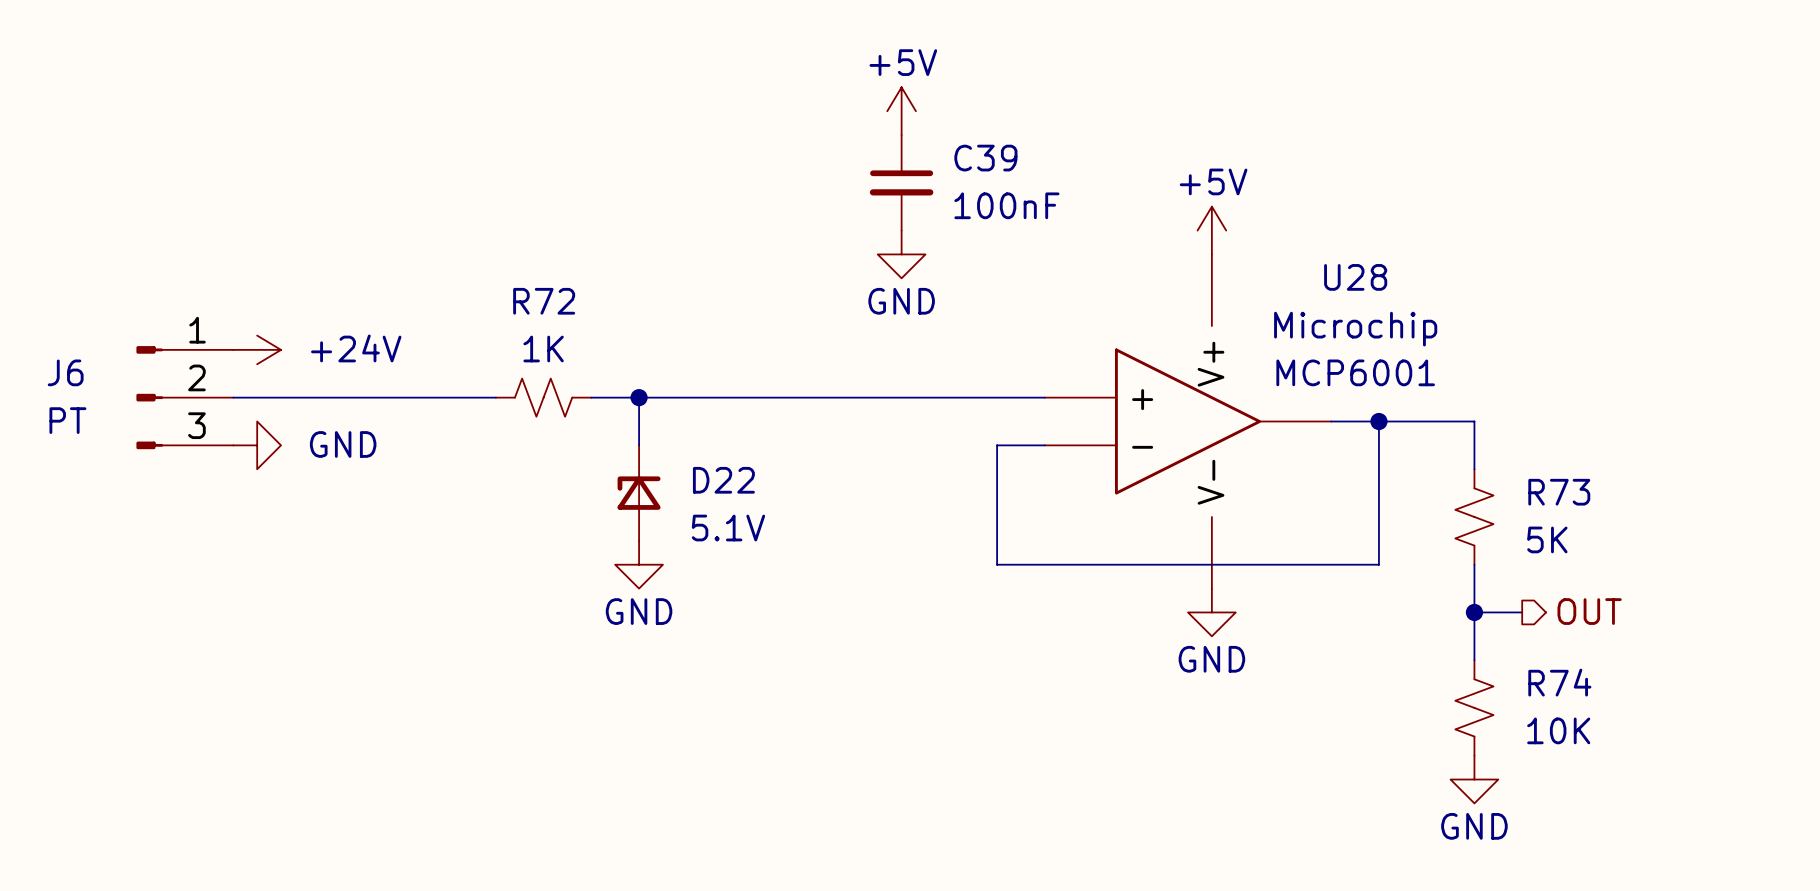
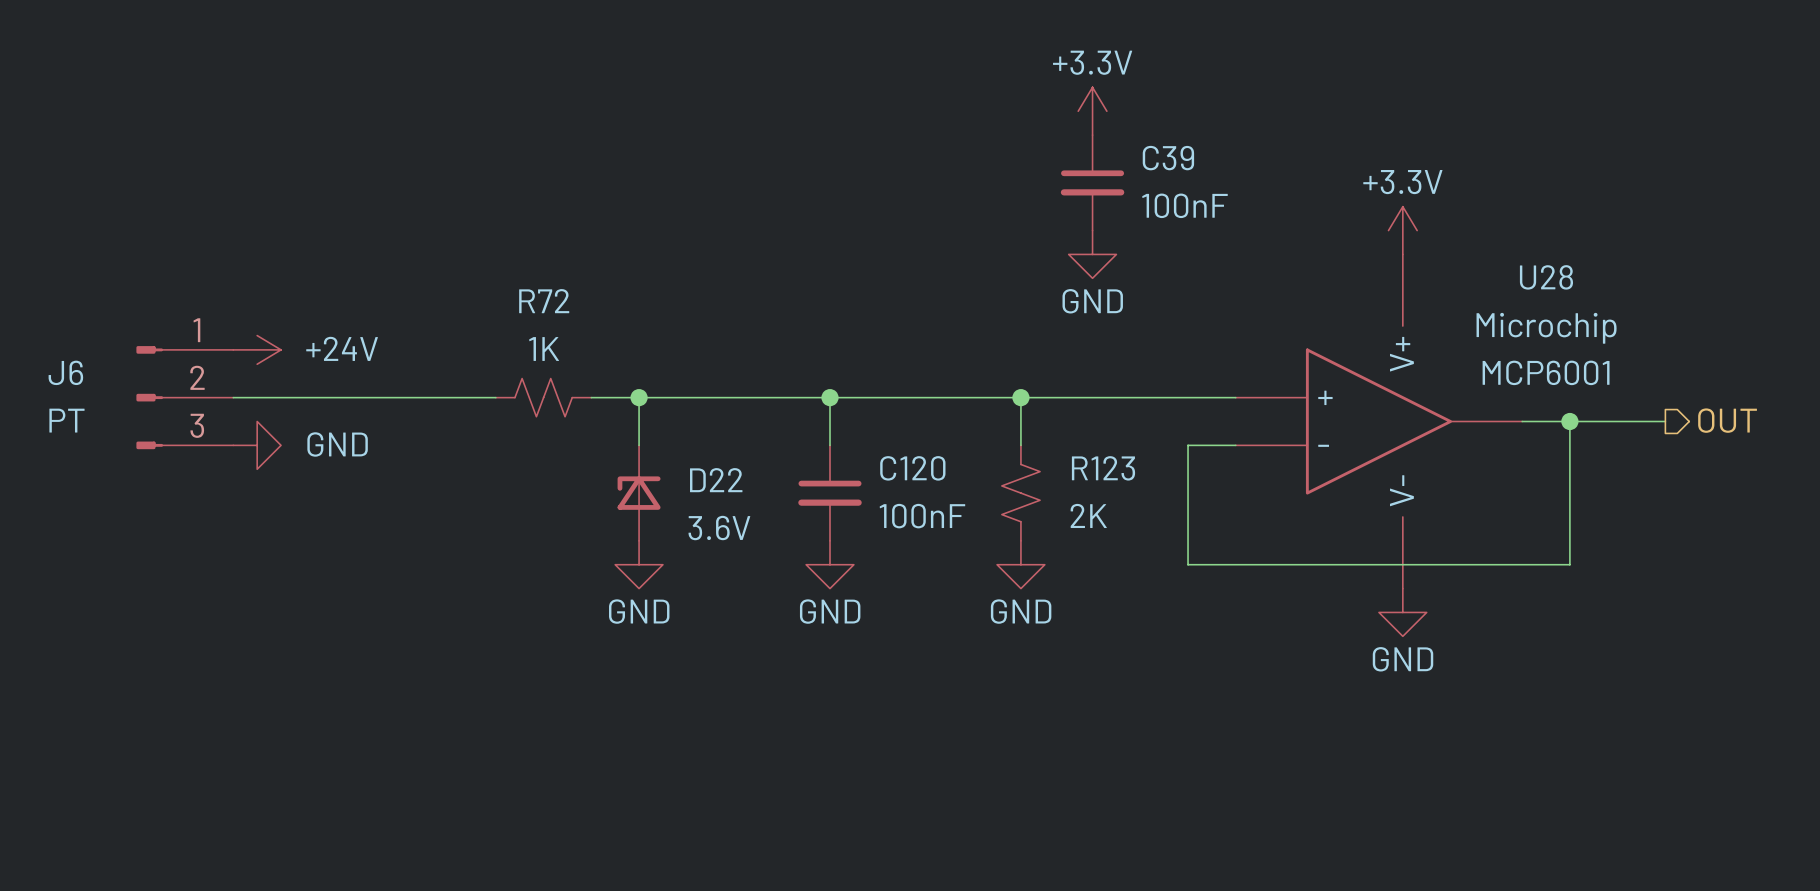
power symbol: +5V (901, 111) -> none
power symbol: none -> +3.3V (1092, 111)
C39 position: (901, 182) -> (1092, 182)
power symbol: +5V (1211, 230) -> none
power symbol: none -> +3.3V (1402, 230)
power symbol: GND (901, 254) -> none
power symbol: none -> GND (1092, 254)
wire: none -> (830, 397) (830, 445)
junction: none -> (830, 397)
wire: none -> (1020, 397) (1020, 445)
junction: none -> (1020, 397)
wire: none -> (1044, 397) (1235, 397)
U28 position: (1188, 421) -> (1378, 421)
wire: (1331, 421) (1474, 421) (1474, 469) -> none
wire: (1378, 421) (1378, 564) -> (1569, 421) (1569, 564) (1378, 564)
junction: (1378, 421) -> none
wire: none -> (1522, 421) (1665, 421)
junction: none -> (1569, 421)
wire: (1044, 445) (997, 445) (997, 564) (1188, 564) -> (1235, 445) (1188, 445) (1188, 564)
C120: none -> 100nF (830, 493)
R123: none -> 2K (1020, 493)
R73: 5K (1474, 516) -> none
D22 value: 5.1V (728, 528) -> 3.6V (719, 528)
power symbol: none -> GND (830, 564)
power symbol: none -> GND (1020, 564)
wire: (1474, 564) (1474, 660) -> none
hierarchical label position: OUT (1589, 611) -> OUT (1727, 420)
power symbol: GND (1211, 612) -> none
power symbol: none -> GND (1402, 612)
wire: (1474, 612) (1522, 612) -> none
junction: (1474, 612) -> none
R74: 10K (1474, 707) -> none
power symbol: GND (1474, 779) -> none

